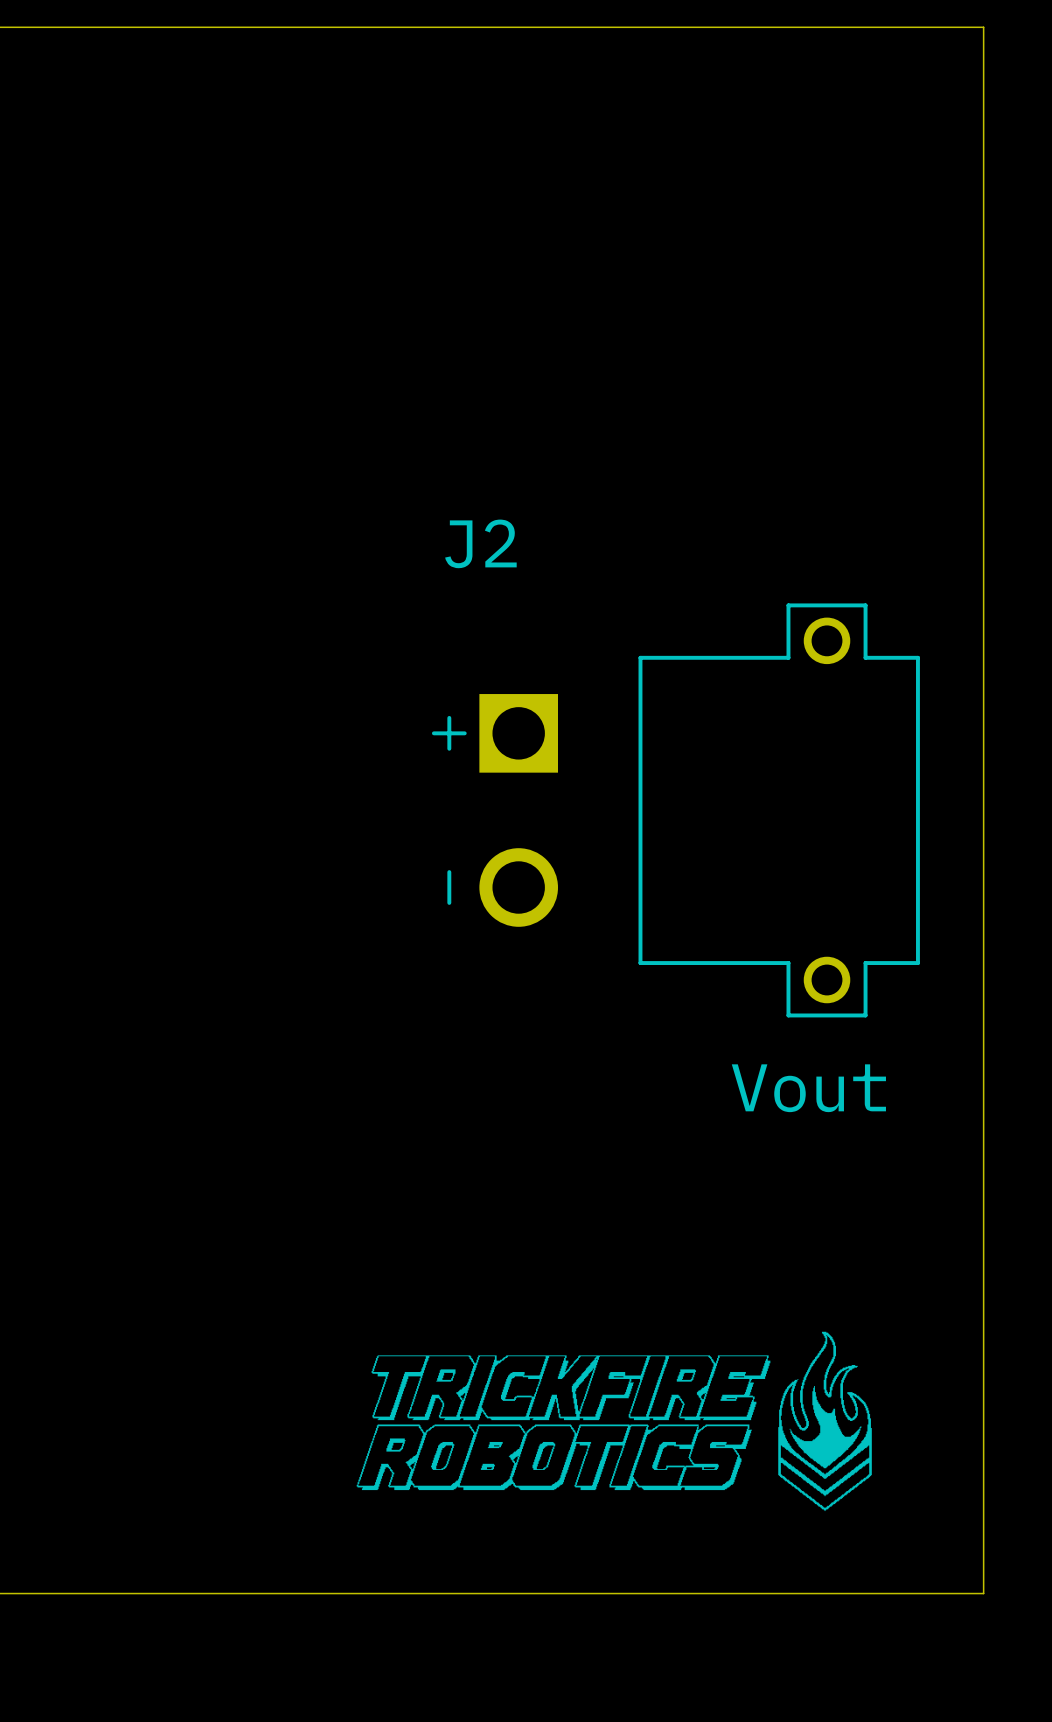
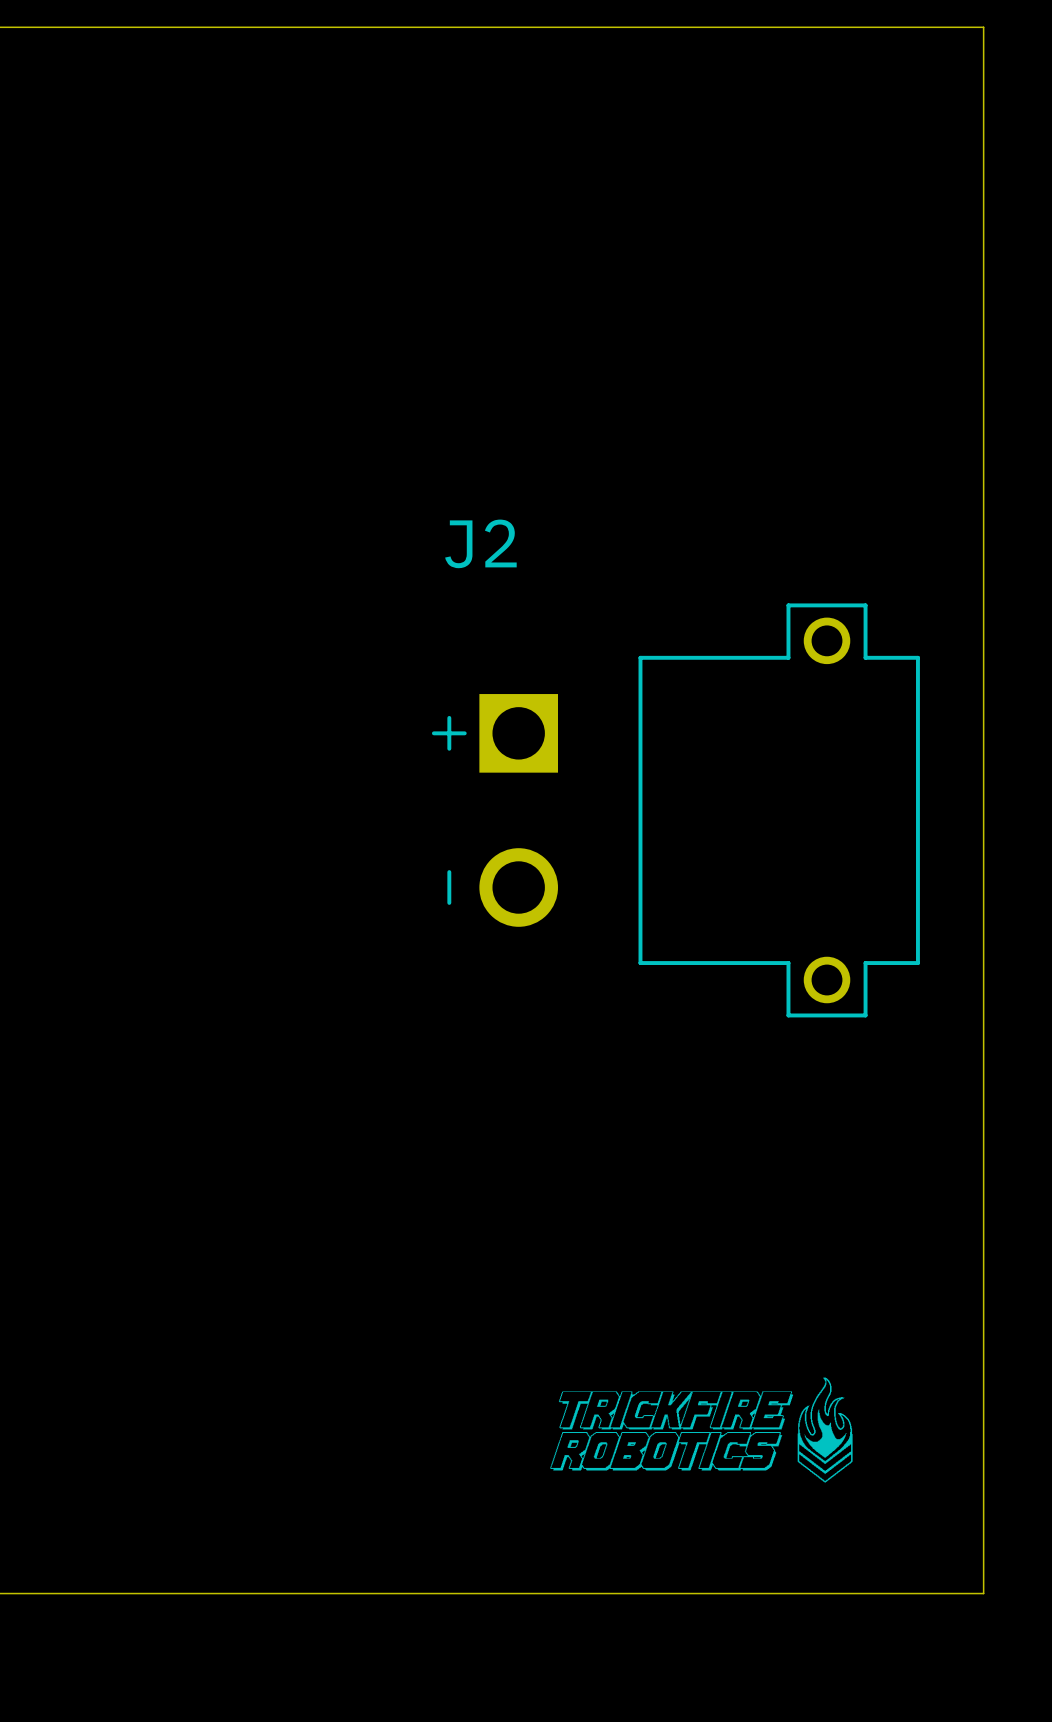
text: Vout (808, 1088) -> none
drawing: [371, 1331, 872, 1512] -> none
drawing: none -> [550, 1377, 853, 1483]
drawing shape: [356, 1424, 753, 1491] -> [567, 1440, 579, 1448]

